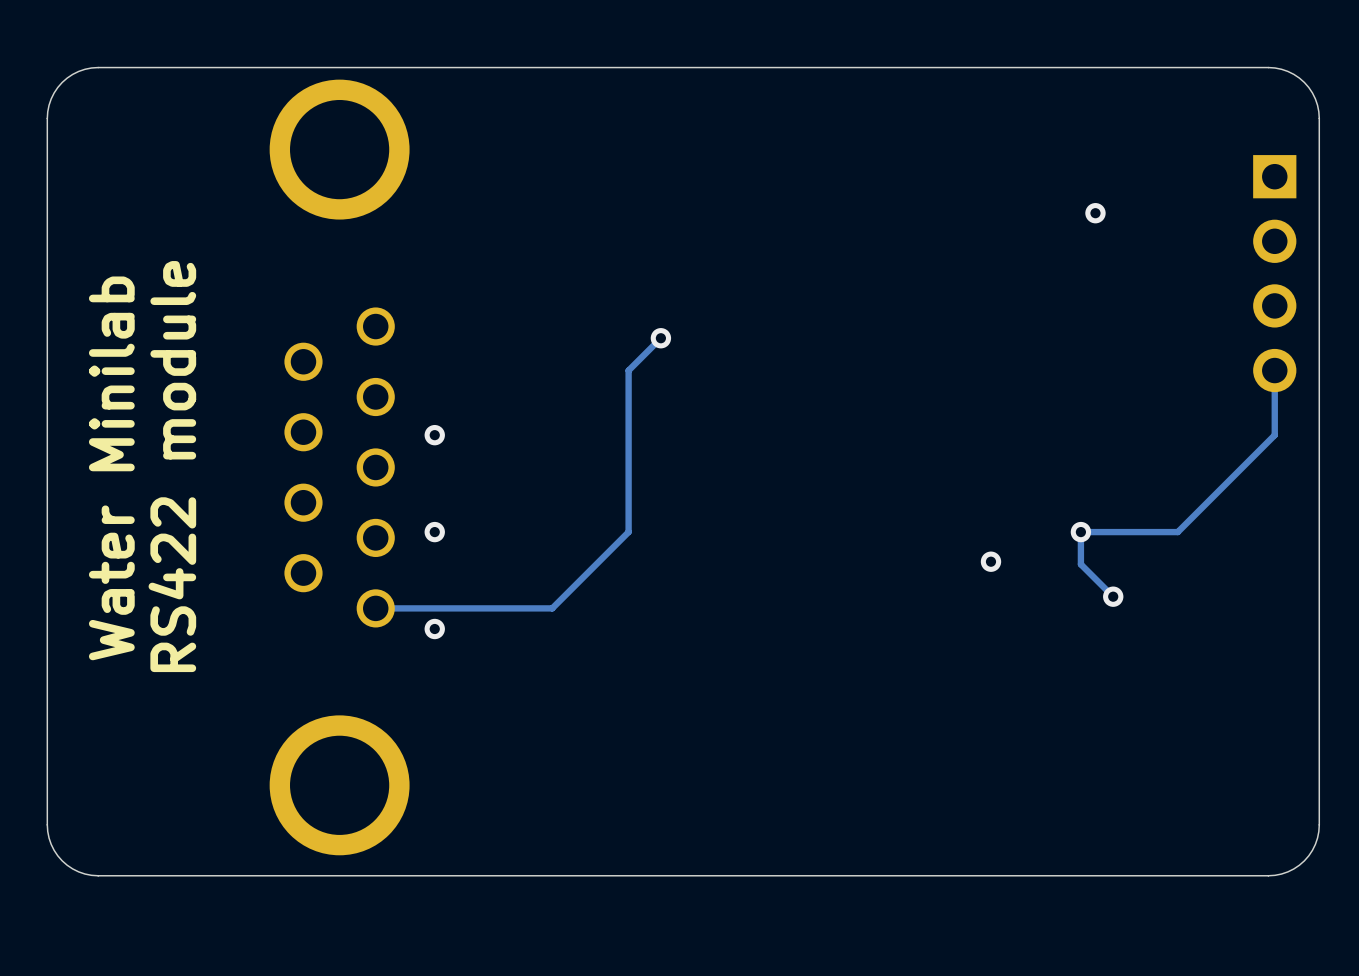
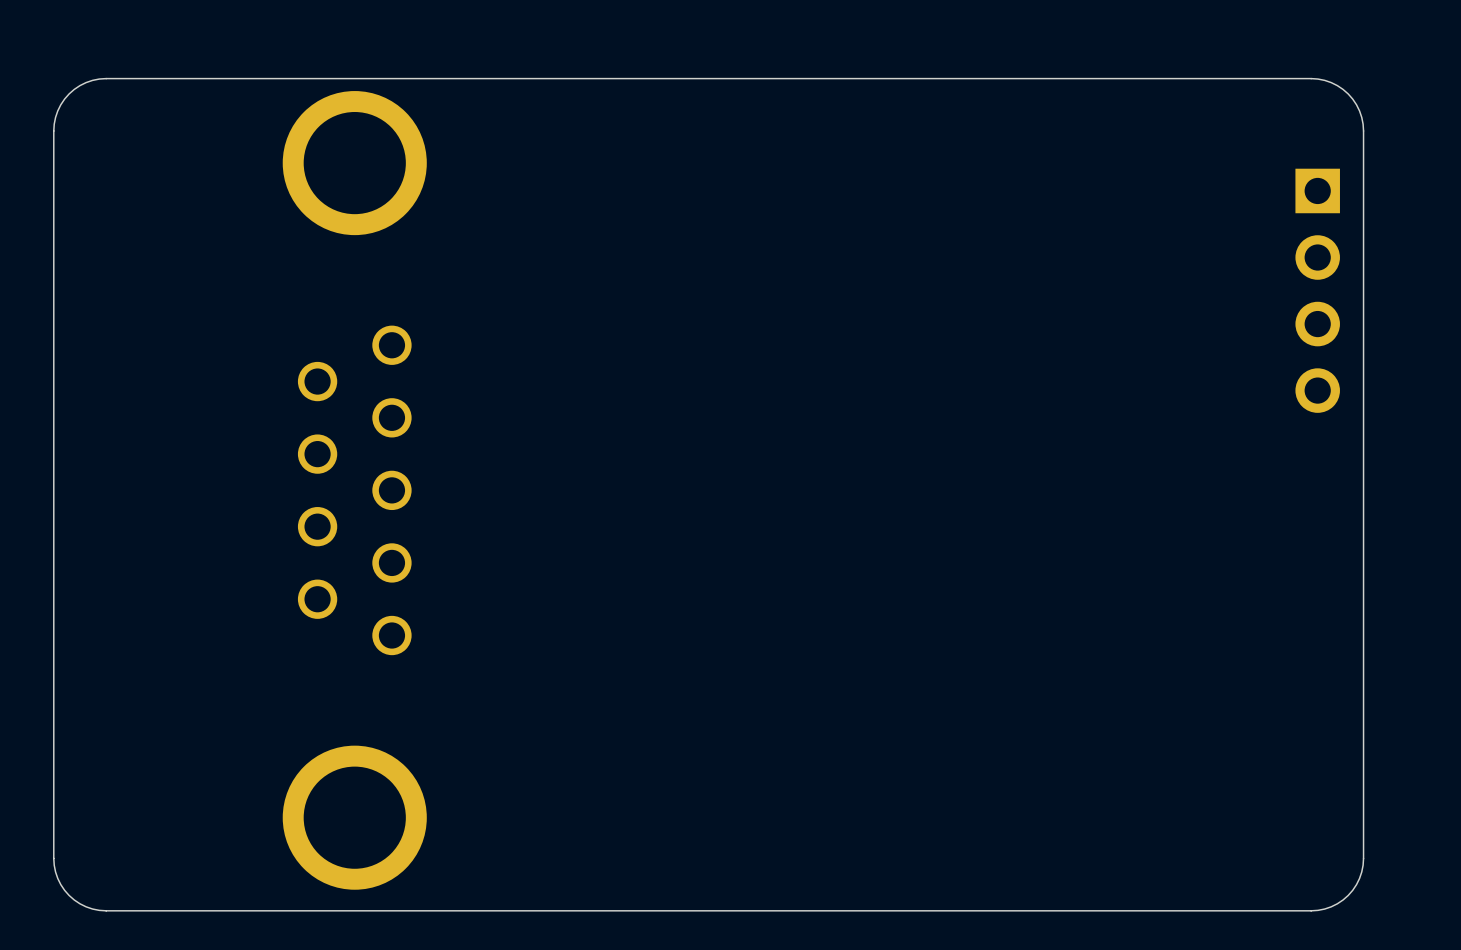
via: (1095, 213) -> none
track: (660, 338) (628, 370) (628, 532) (552, 608) (375, 608) -> none
via: (660, 338) -> none
track: (1274, 370) (1274, 435) (1177, 532) (1080, 532) (1080, 564) (1113, 596) -> none
via: (434, 435) -> none
text: RS422 module (172, 466) -> none
text: Water Minilab (111, 468) -> none
via: (434, 532) -> none
via: (1080, 532) -> none
via: (990, 561) -> none
via: (1113, 596) -> none
via: (434, 629) -> none

